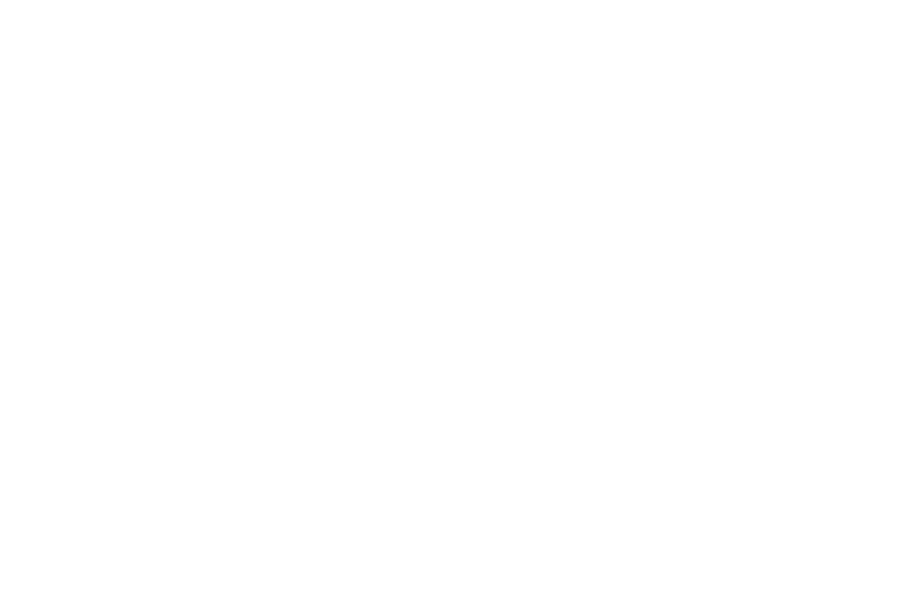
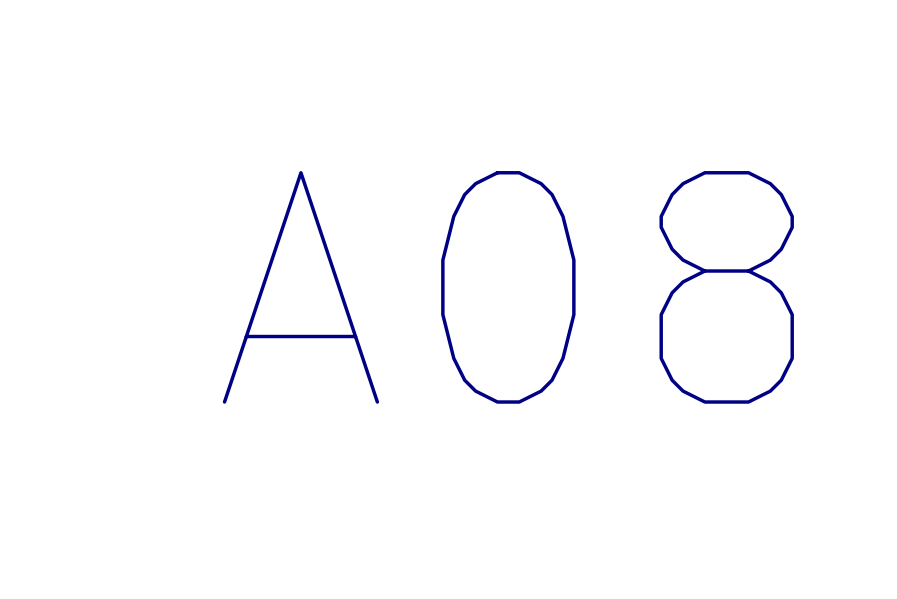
text: none -> A08 (508, 287)

